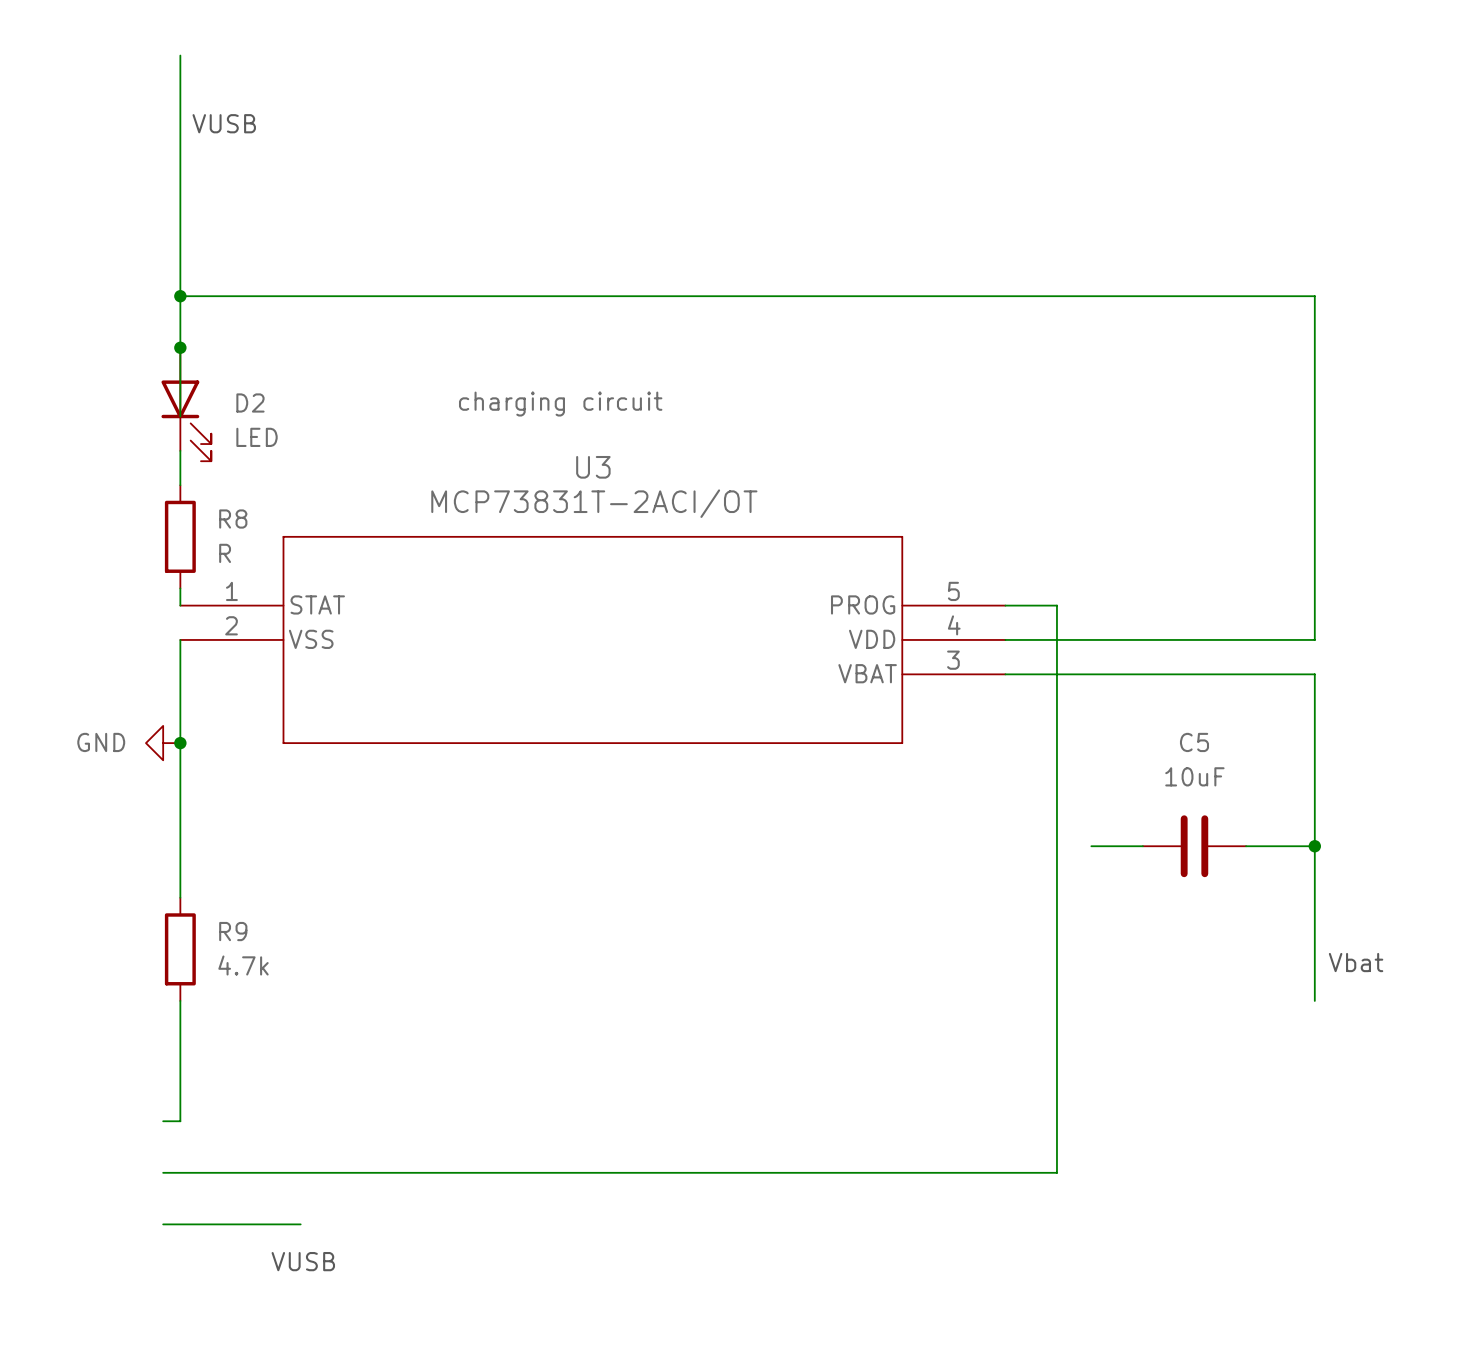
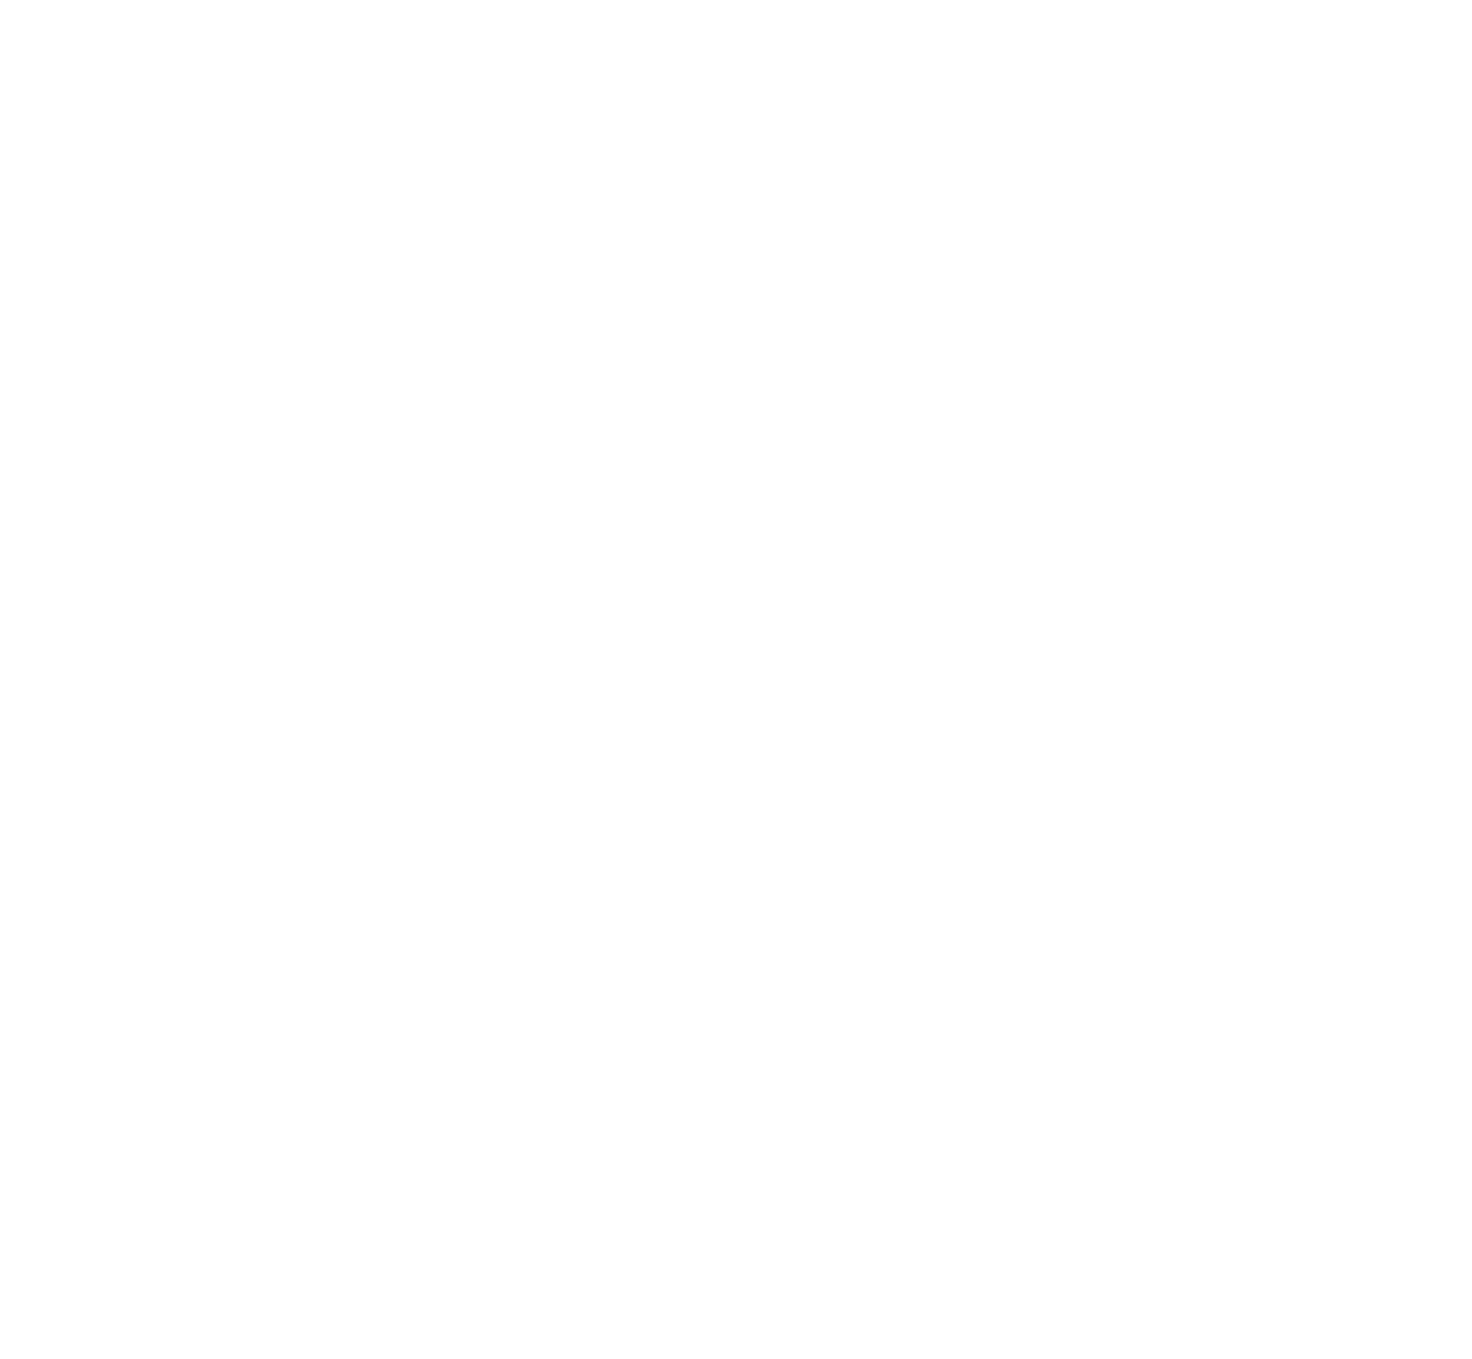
wire: (180, 55) (180, 416) -> none
text: VUSB (224, 123) -> none
wire: (180, 296) (1314, 296) (1314, 639) (1005, 639) -> none
junction: (180, 296) -> none
junction: (180, 347) -> none
D2: LED (186, 404) -> none
label: charging circuit (560, 404) -> none
wire: (180, 450) (180, 485) -> none
R8: R (180, 536) -> none
wire: (180, 588) (180, 605) -> none
wire: (1005, 605) (1056, 605) (1056, 1172) (163, 1172) -> none
wire: (180, 639) (180, 897) -> none
U3: MCP73831T-2ACI/OT (592, 639) -> none
wire: (1005, 674) (1314, 674) (1314, 1000) -> none
power symbol: GND (163, 743) -> none
junction: (180, 743) -> none
wire: (1091, 846) (1142, 846) -> none
C5: 10uF (1194, 846) -> none
wire: (1246, 846) (1314, 846) -> none
junction: (1314, 846) -> none
R9: 4.7k (180, 949) -> none
text: Vbat (1356, 962) -> none
wire: (180, 1000) (180, 1121) (163, 1121) -> none
wire: (163, 1224) (300, 1224) -> none
text: VUSB (303, 1261) -> none

